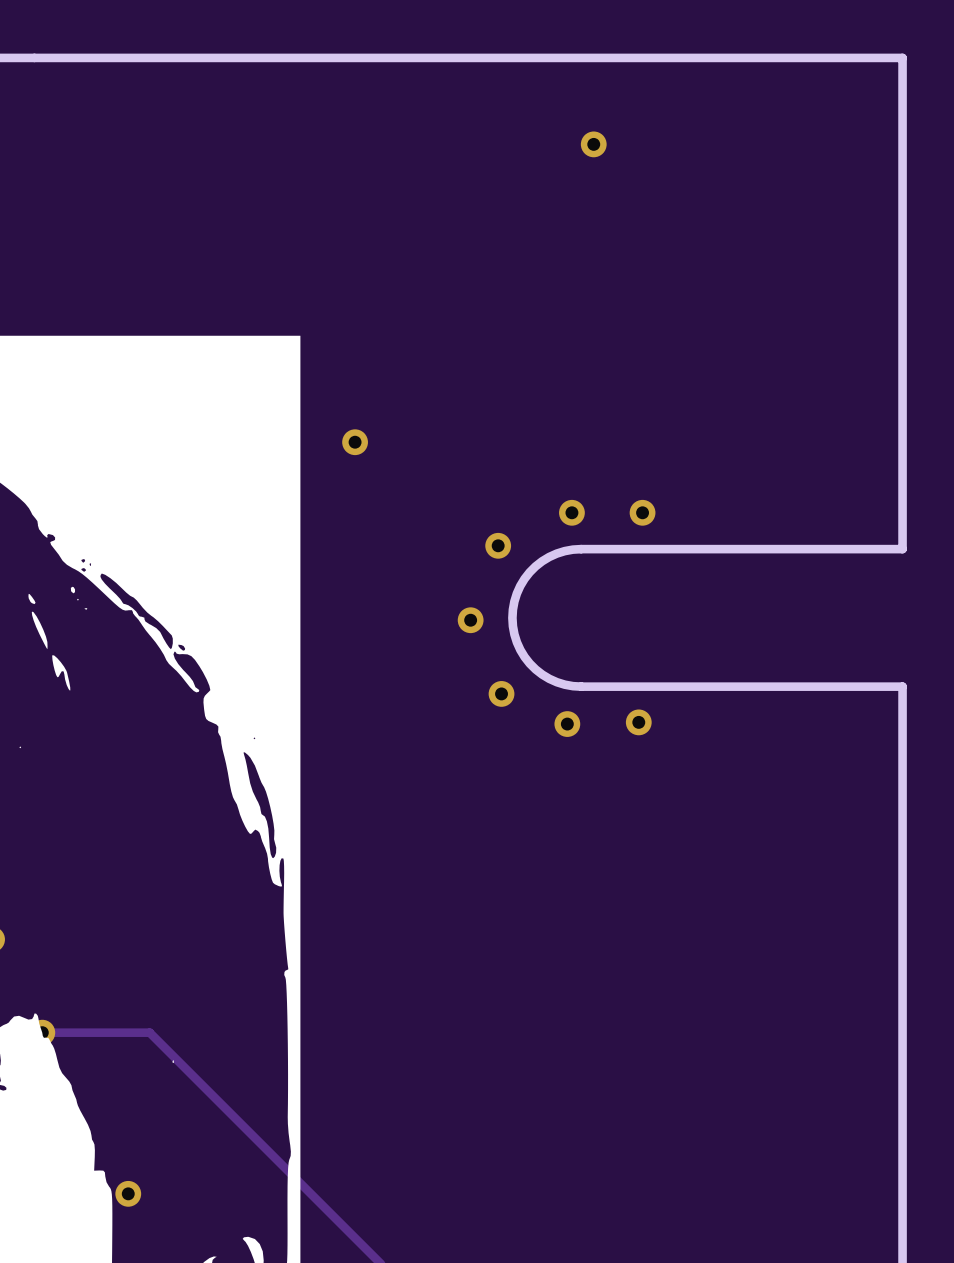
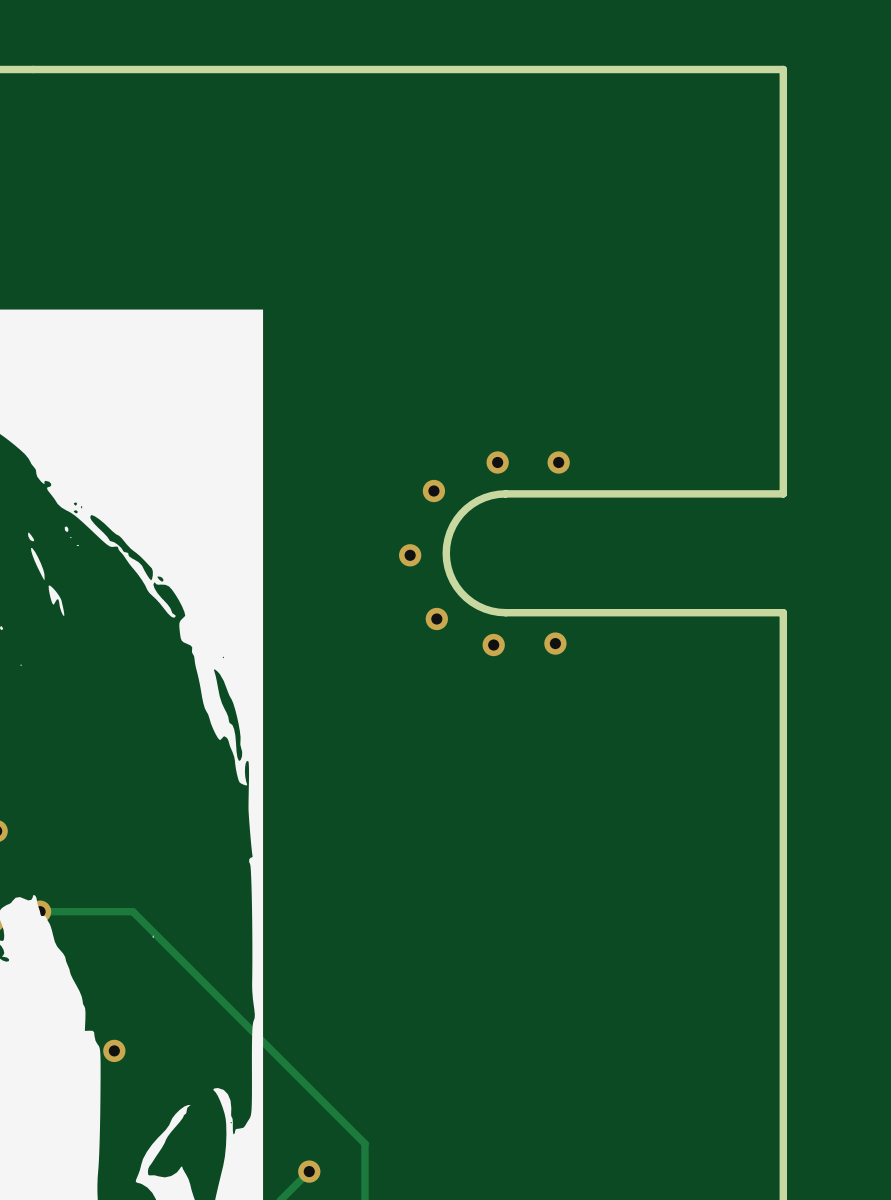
via: (593, 144) -> none
via: (355, 442) -> none

